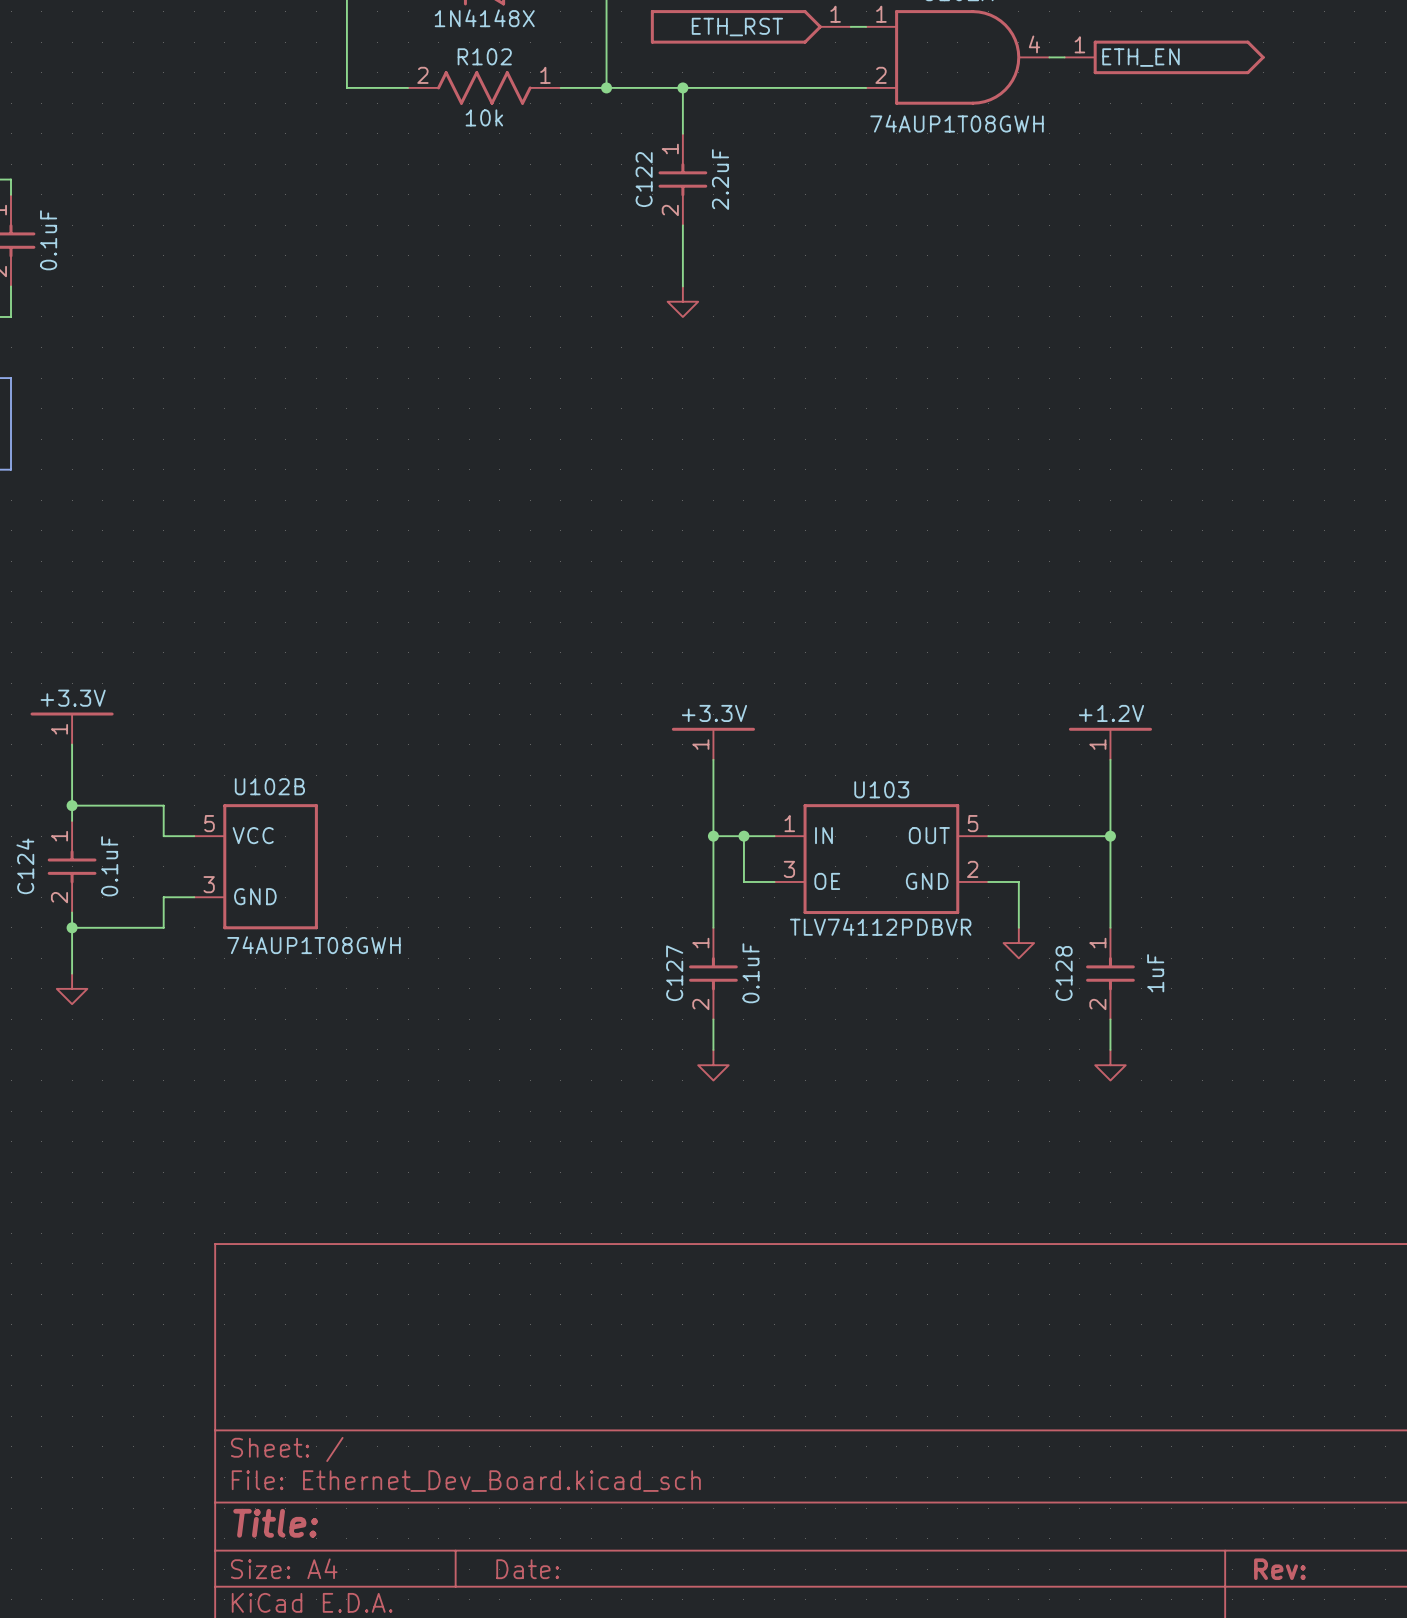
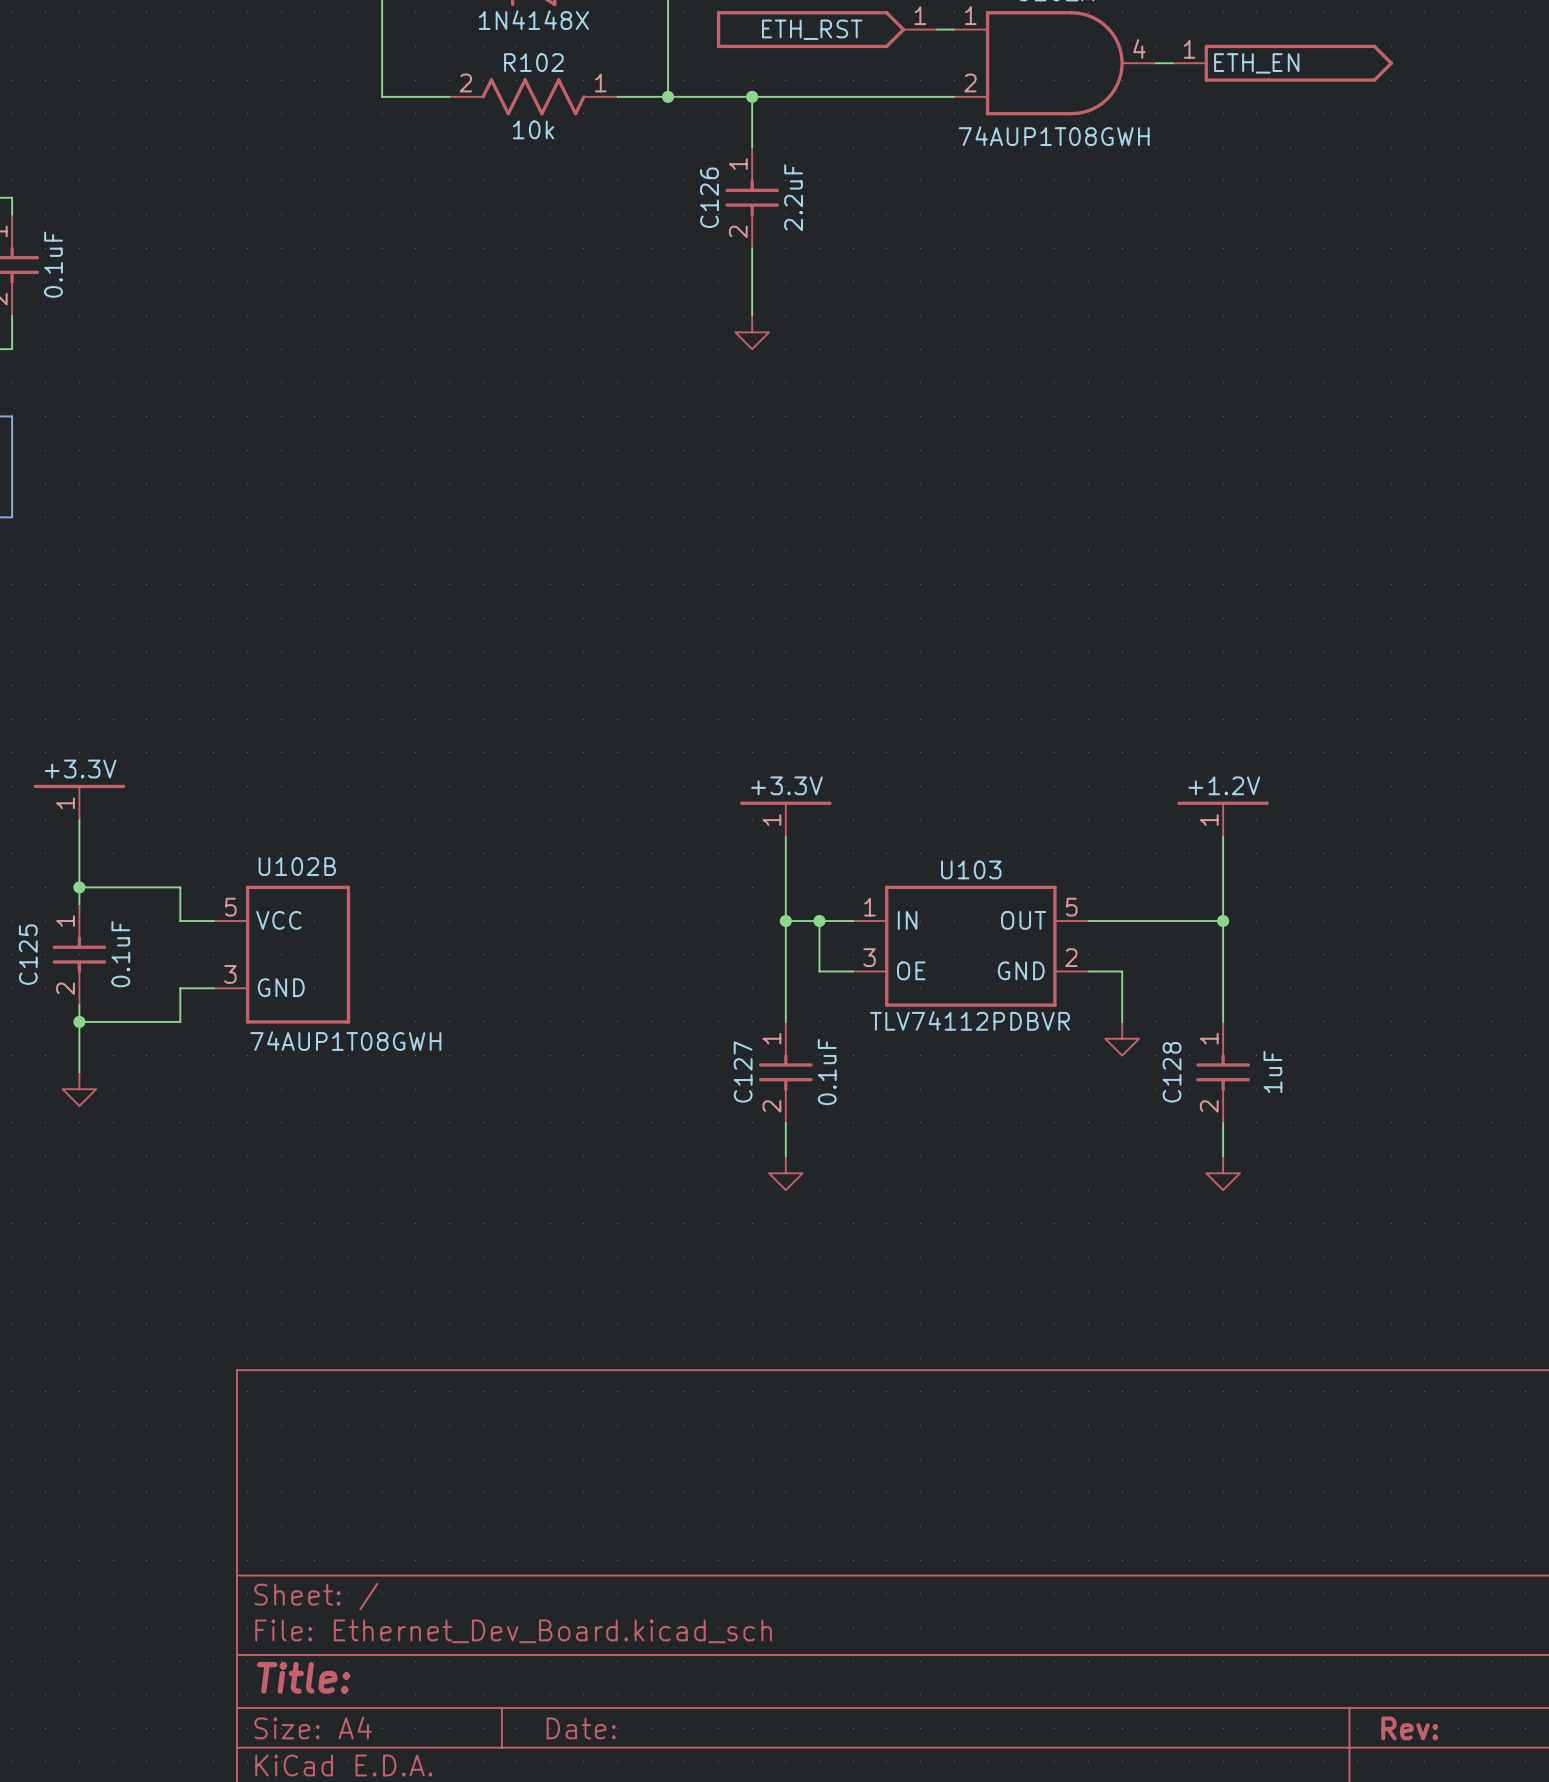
C122 name: C122 (644, 179) -> C126 (709, 197)
C124 name: C124 (25, 866) -> C125 (28, 954)

